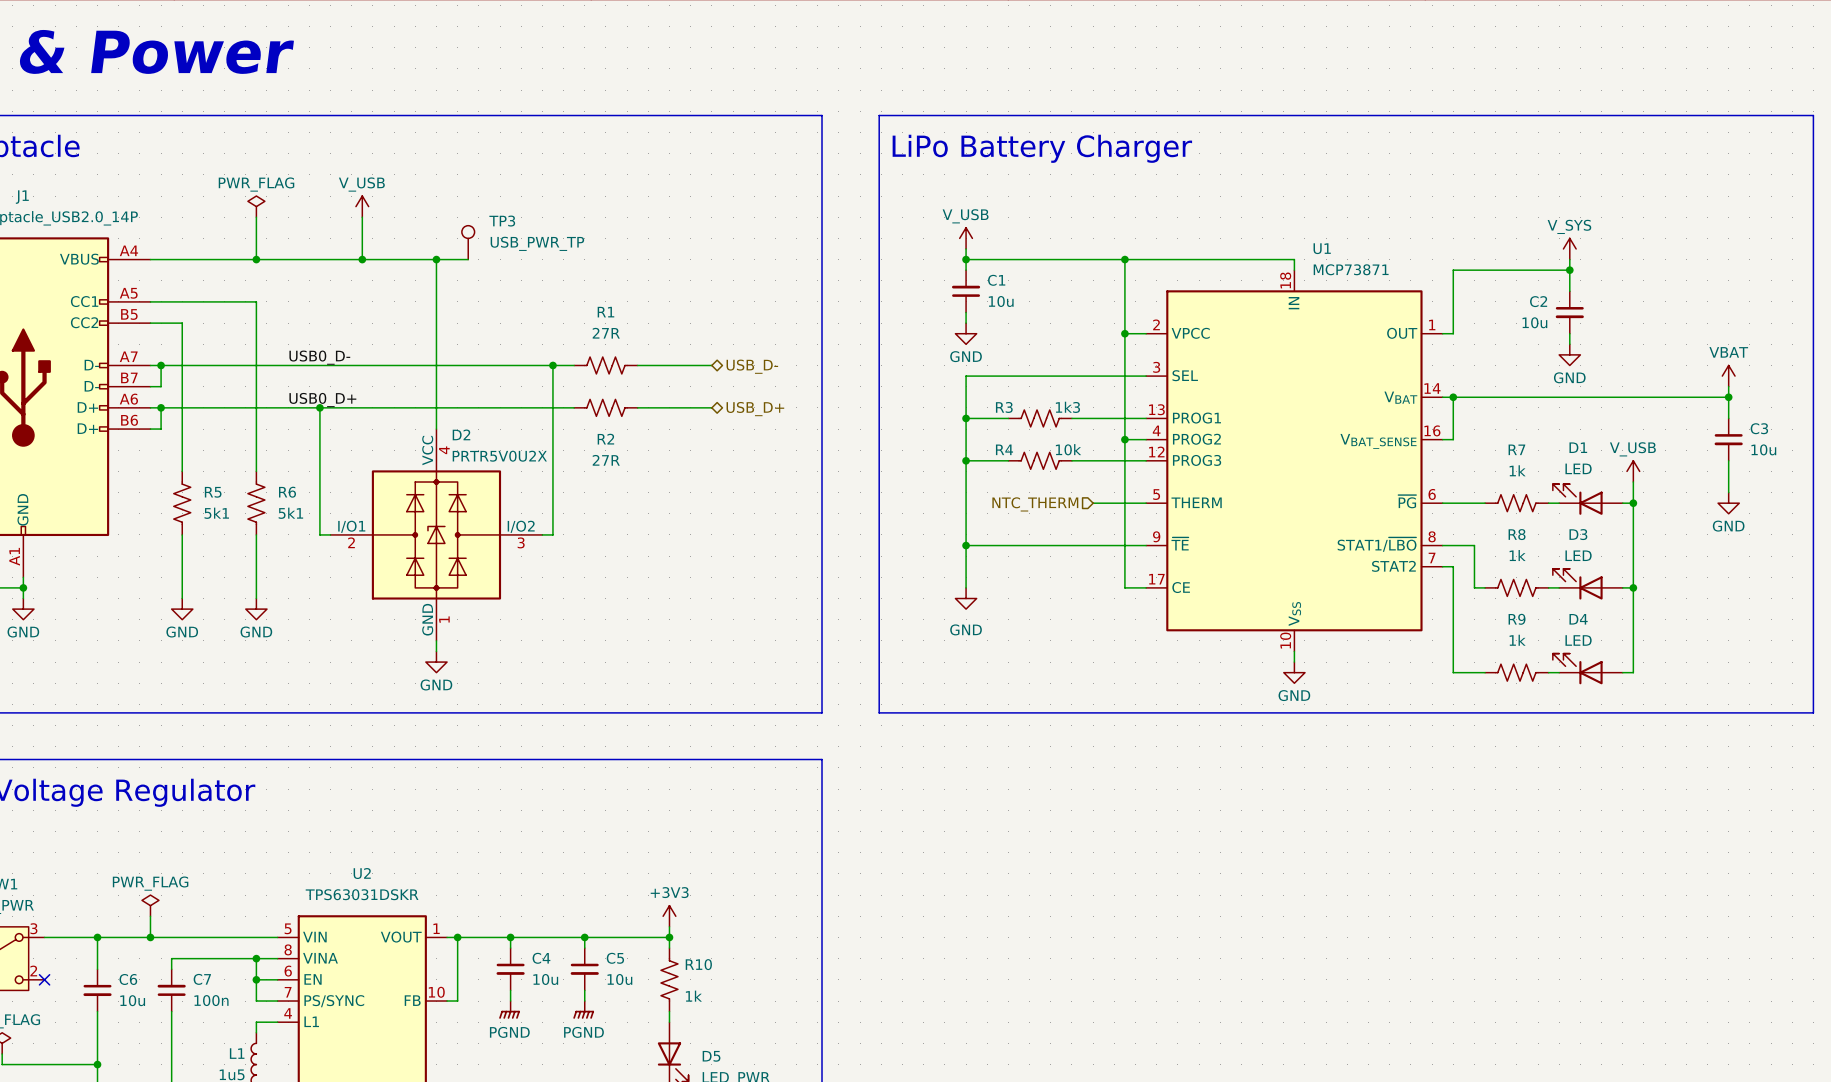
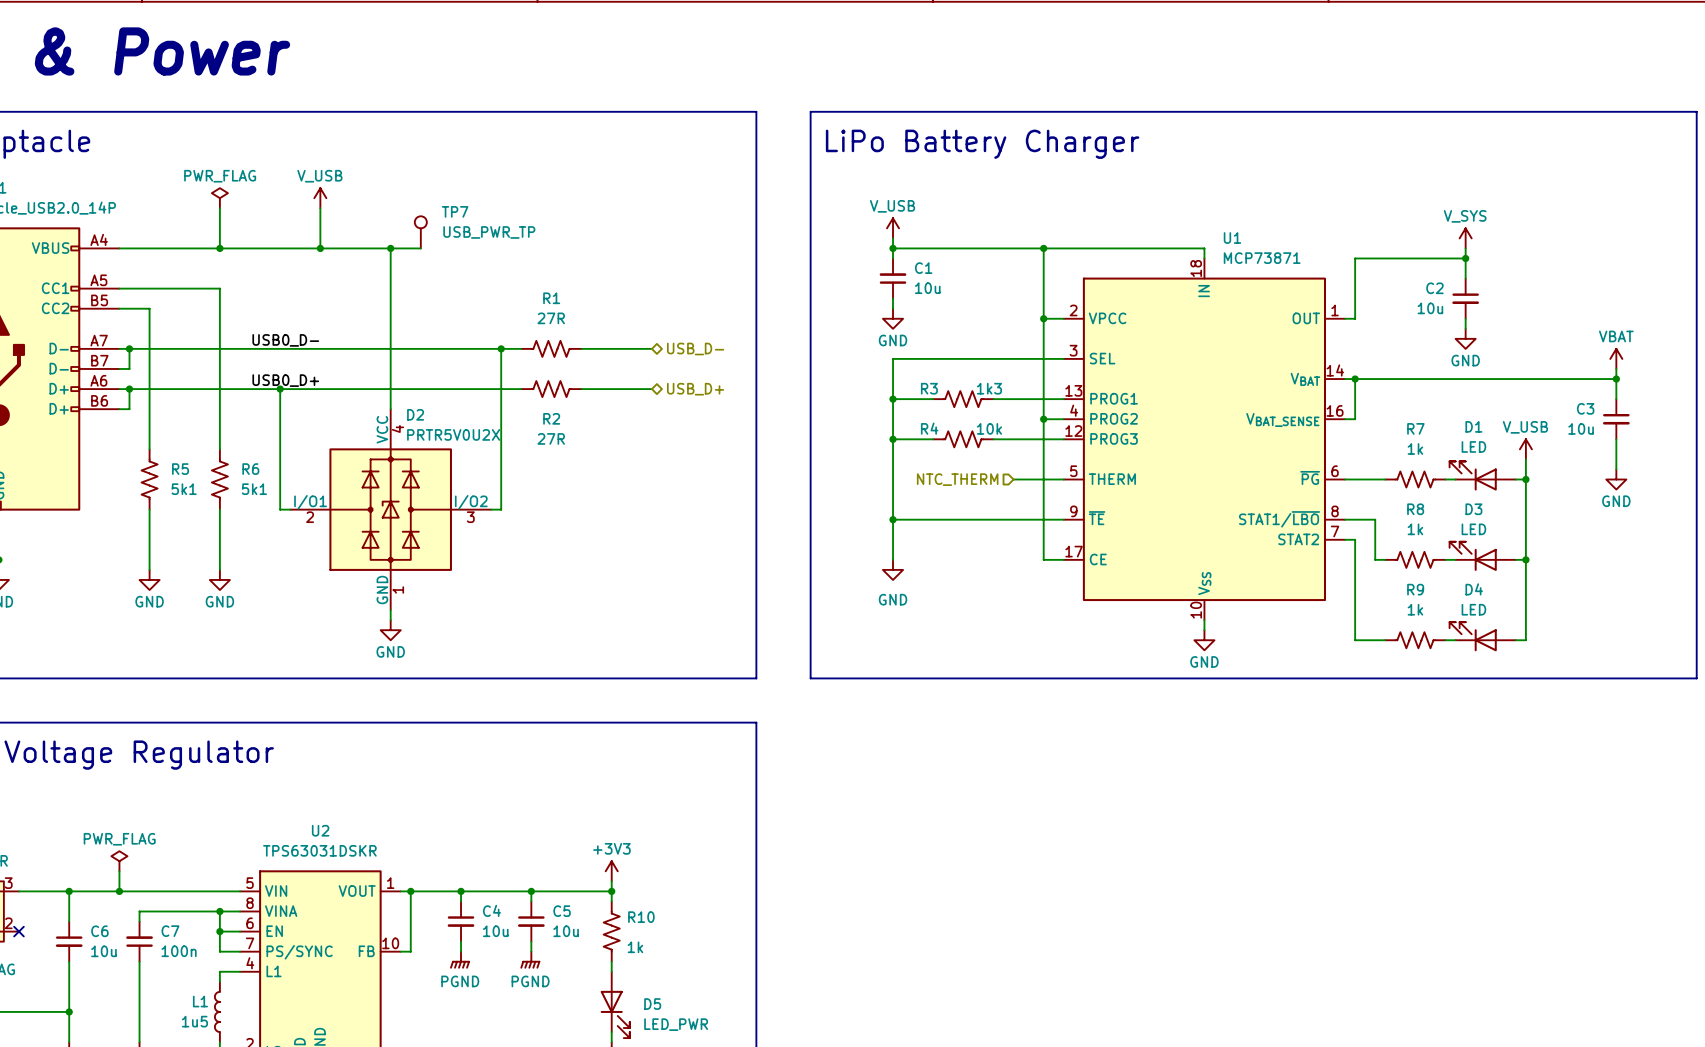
TP3 name: TP3 (502, 221) -> TP7 (455, 211)
C3 name position: C3 (1759, 428) -> C3 (1585, 408)
C3 value position: 10u (1763, 449) -> 10u (1581, 428)

